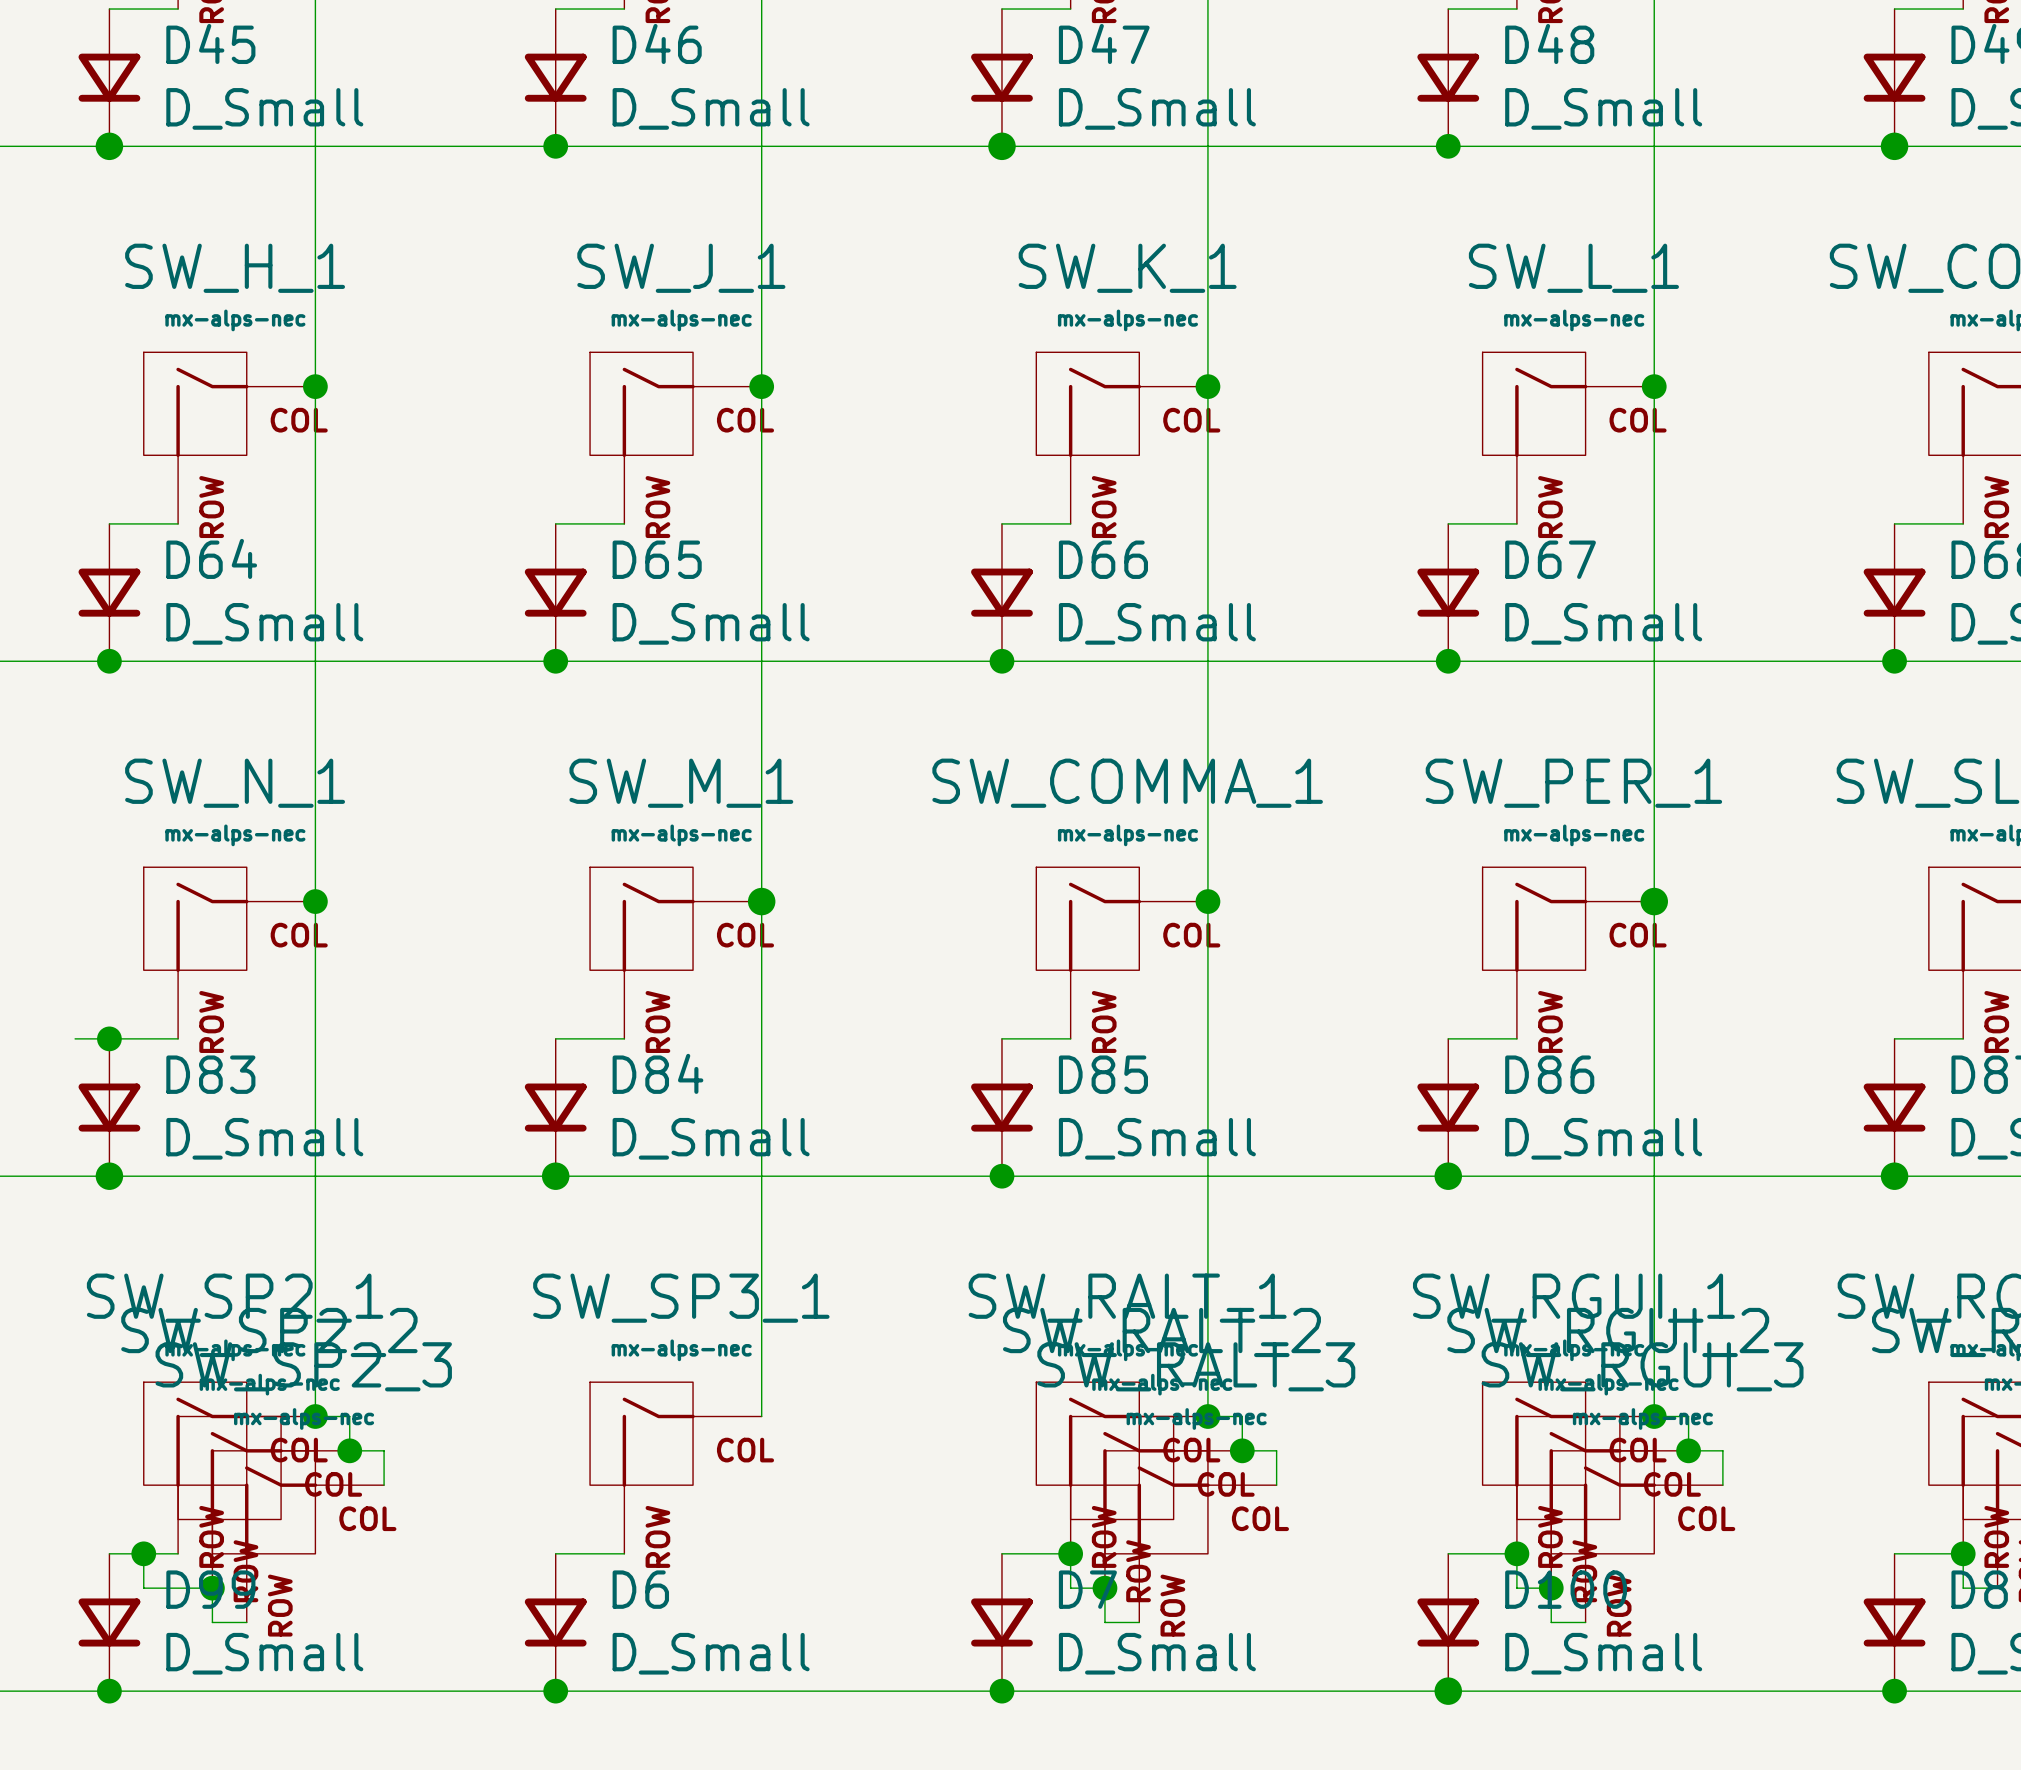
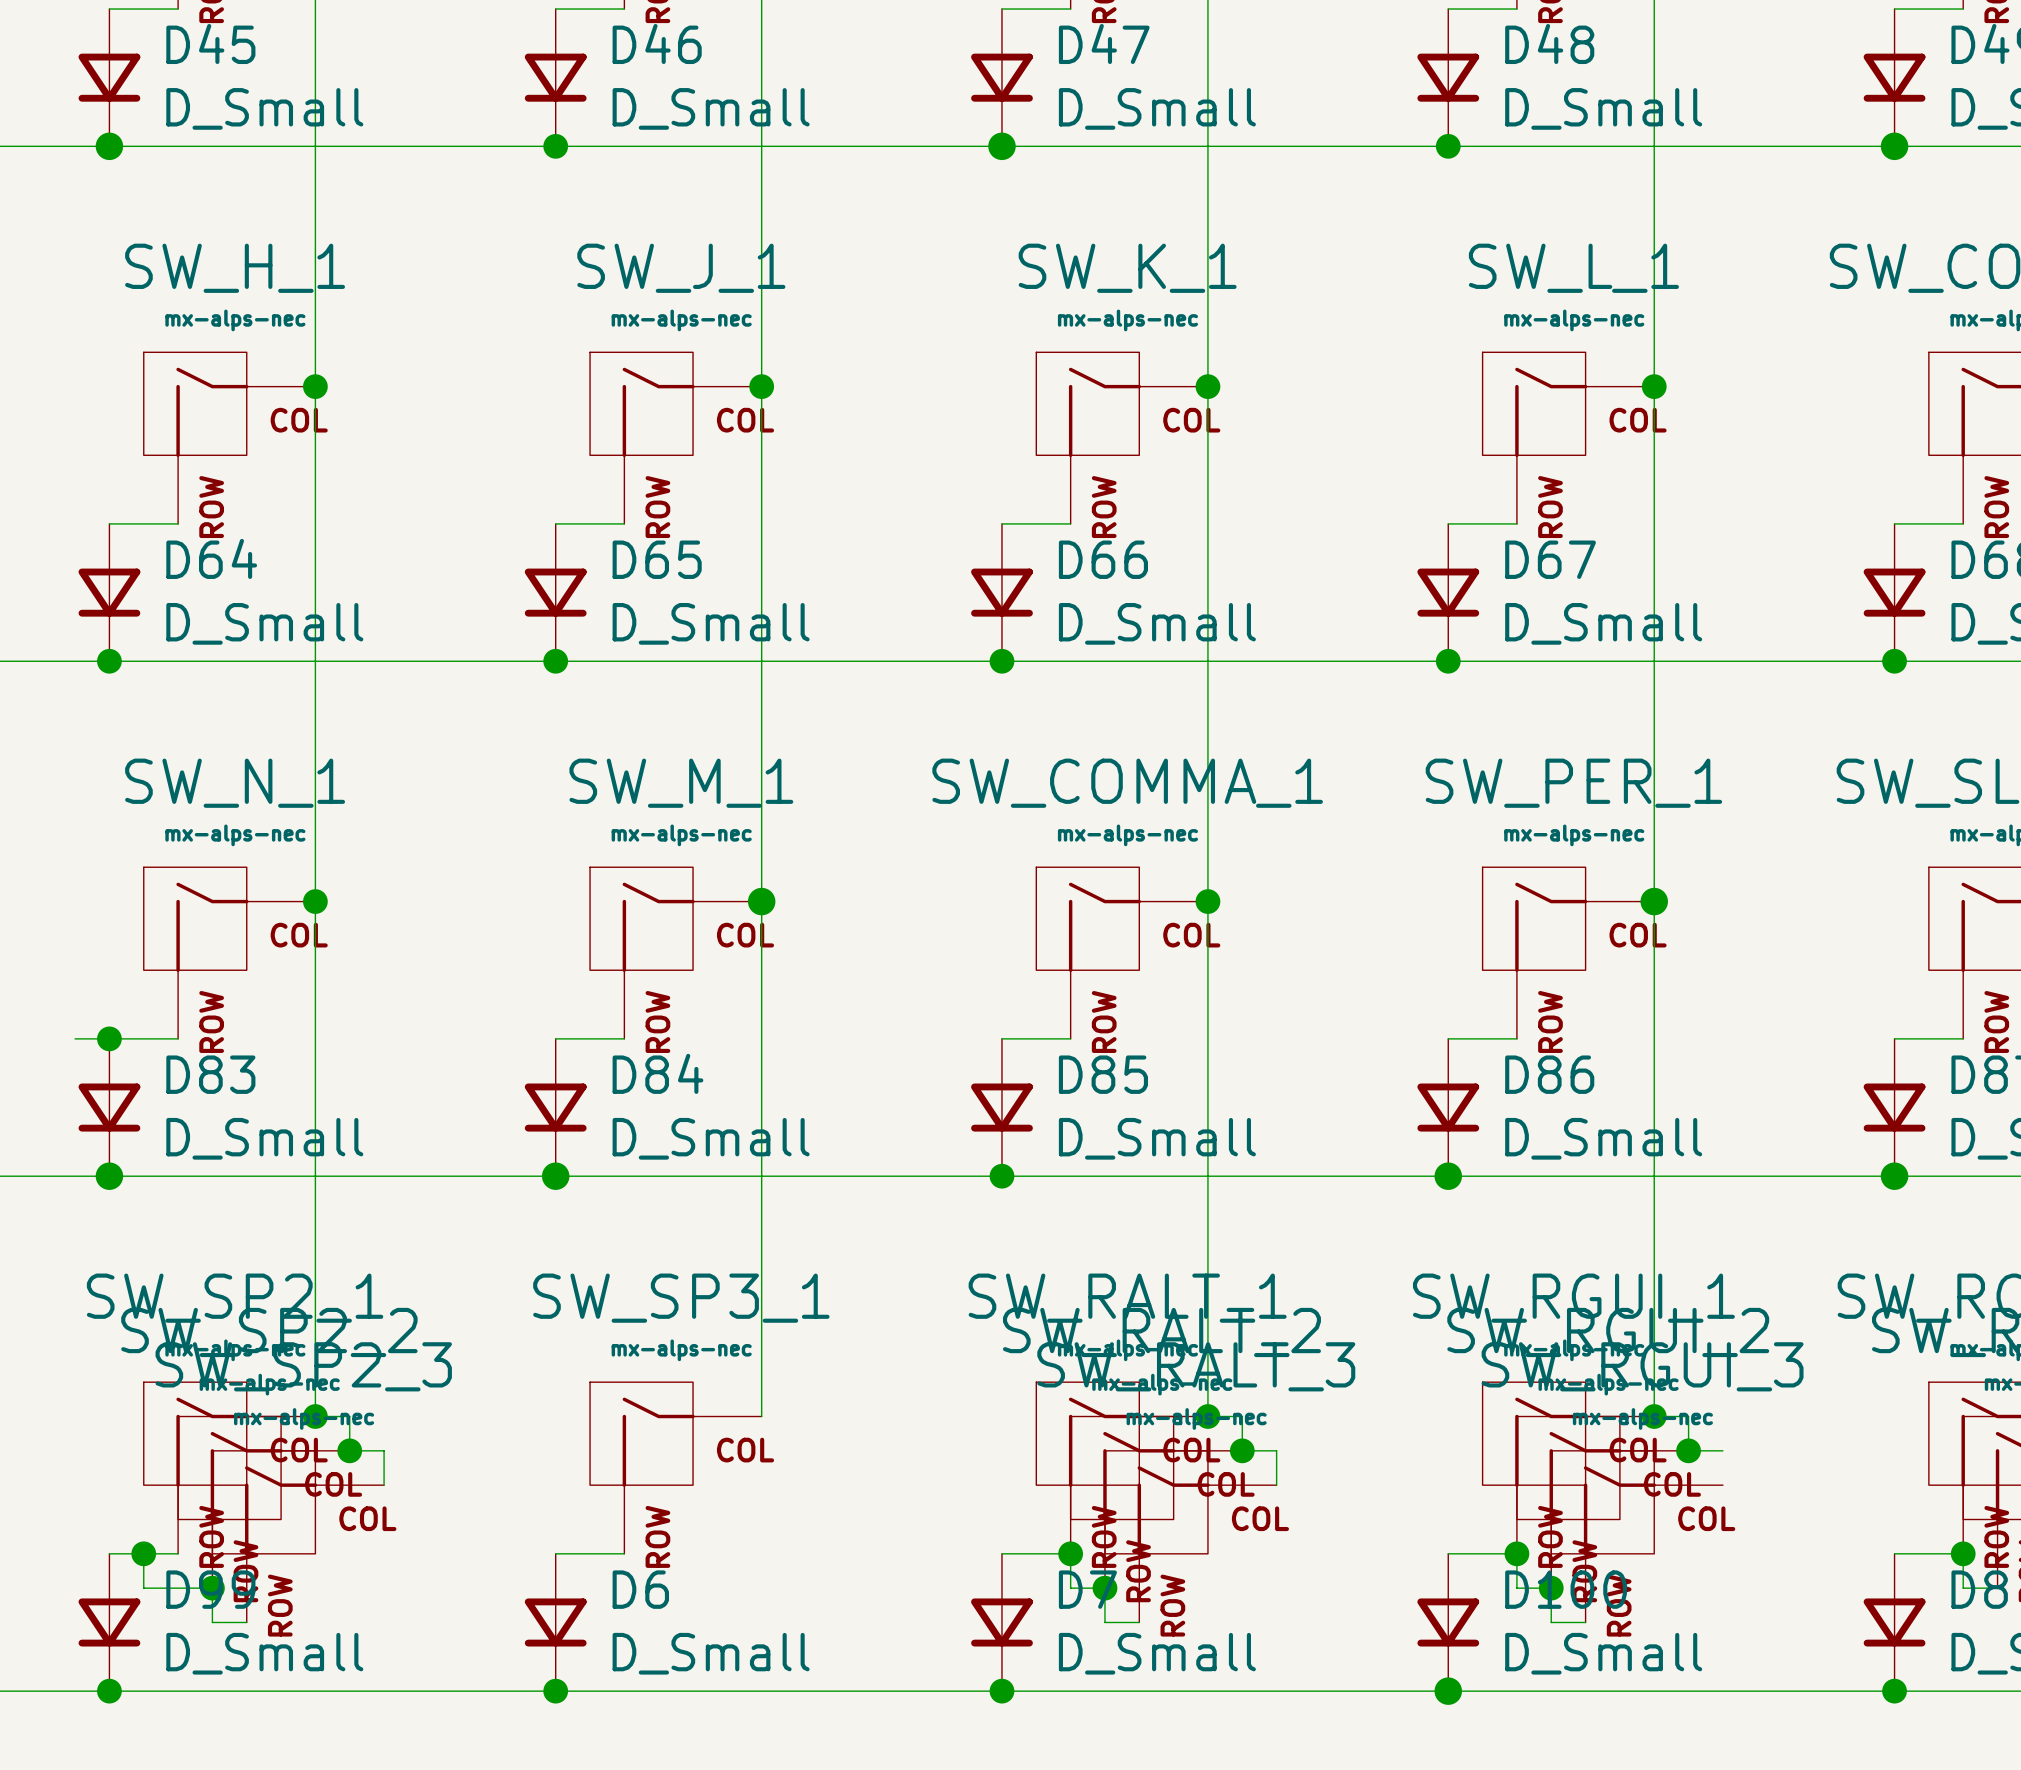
wire: (1722, 1450) (1722, 1485) -> none

